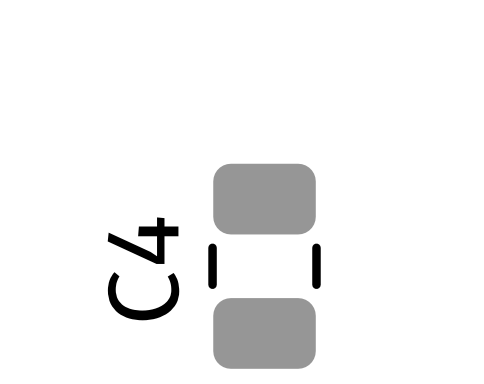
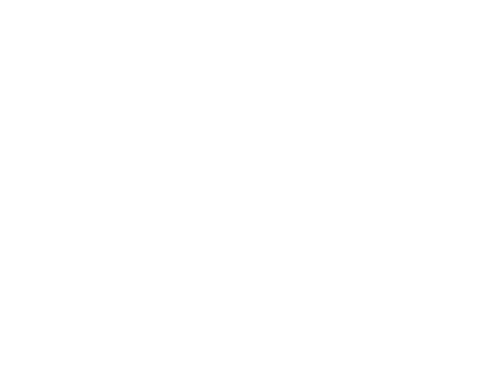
C4: (264, 266) -> none

